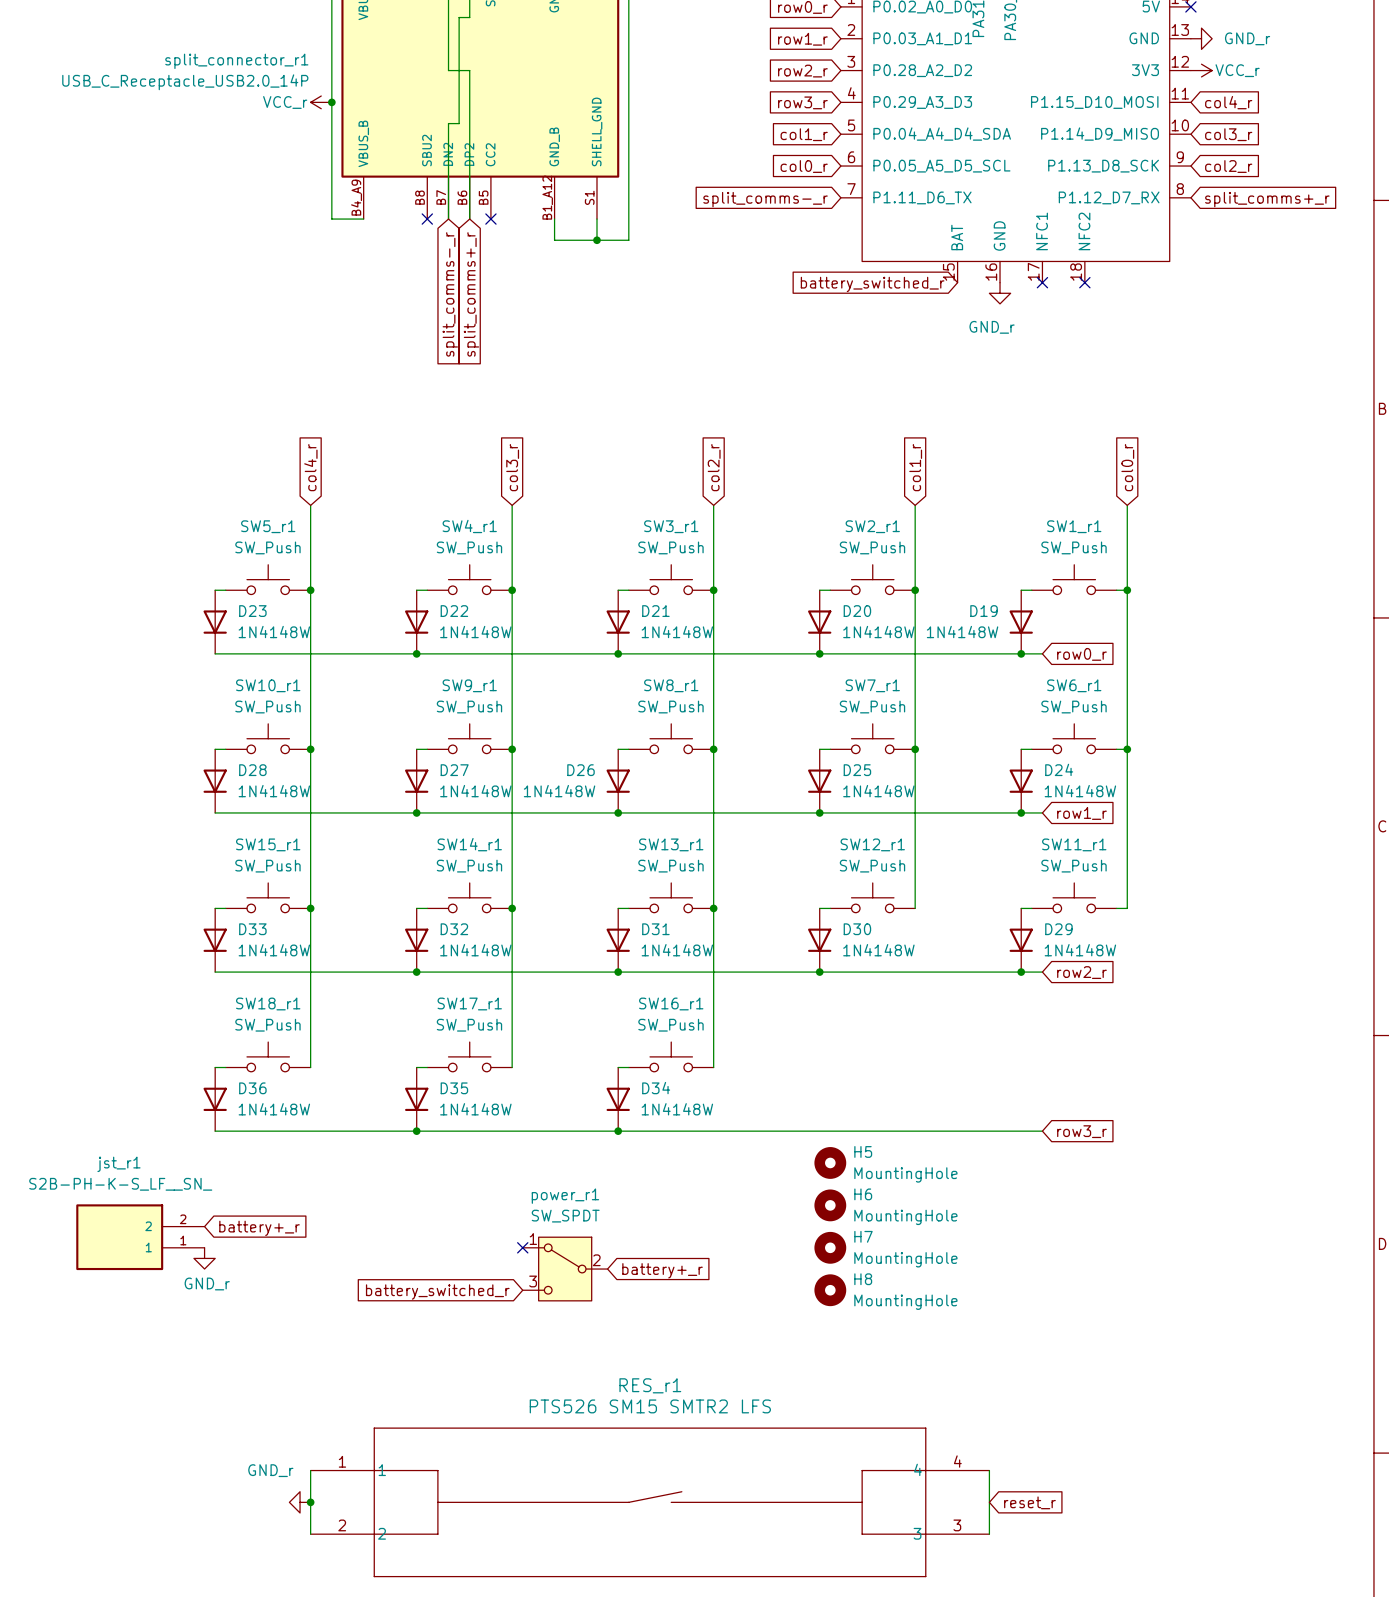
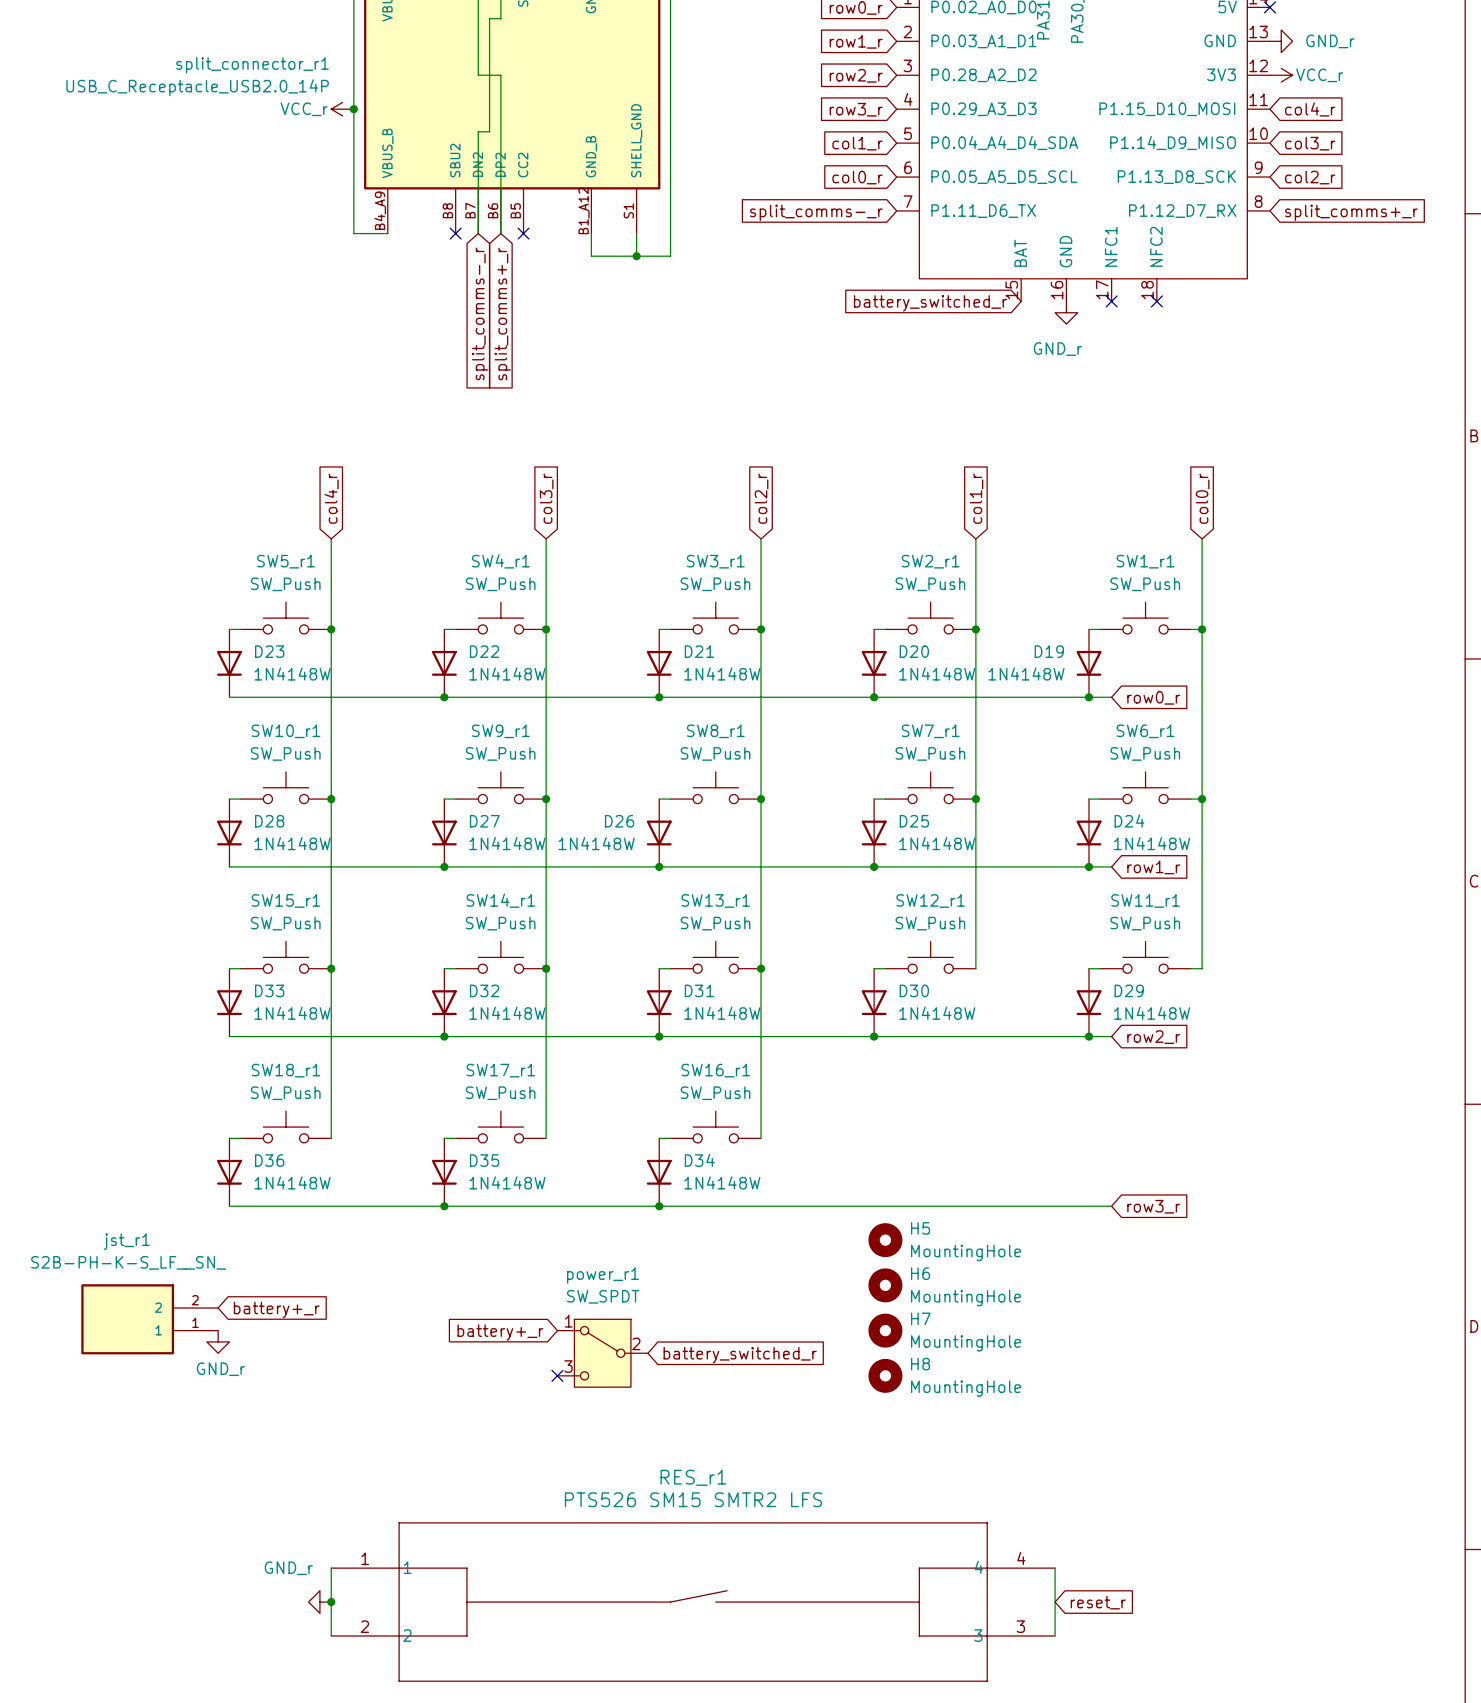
no-connect mark position: (522, 1247) -> (557, 1375)
global label: none -> battery+_r (500, 1332)
global label: battery+_r (662, 1270) -> battery_switched_r (740, 1355)
global label: battery_switched_r (437, 1292) -> none

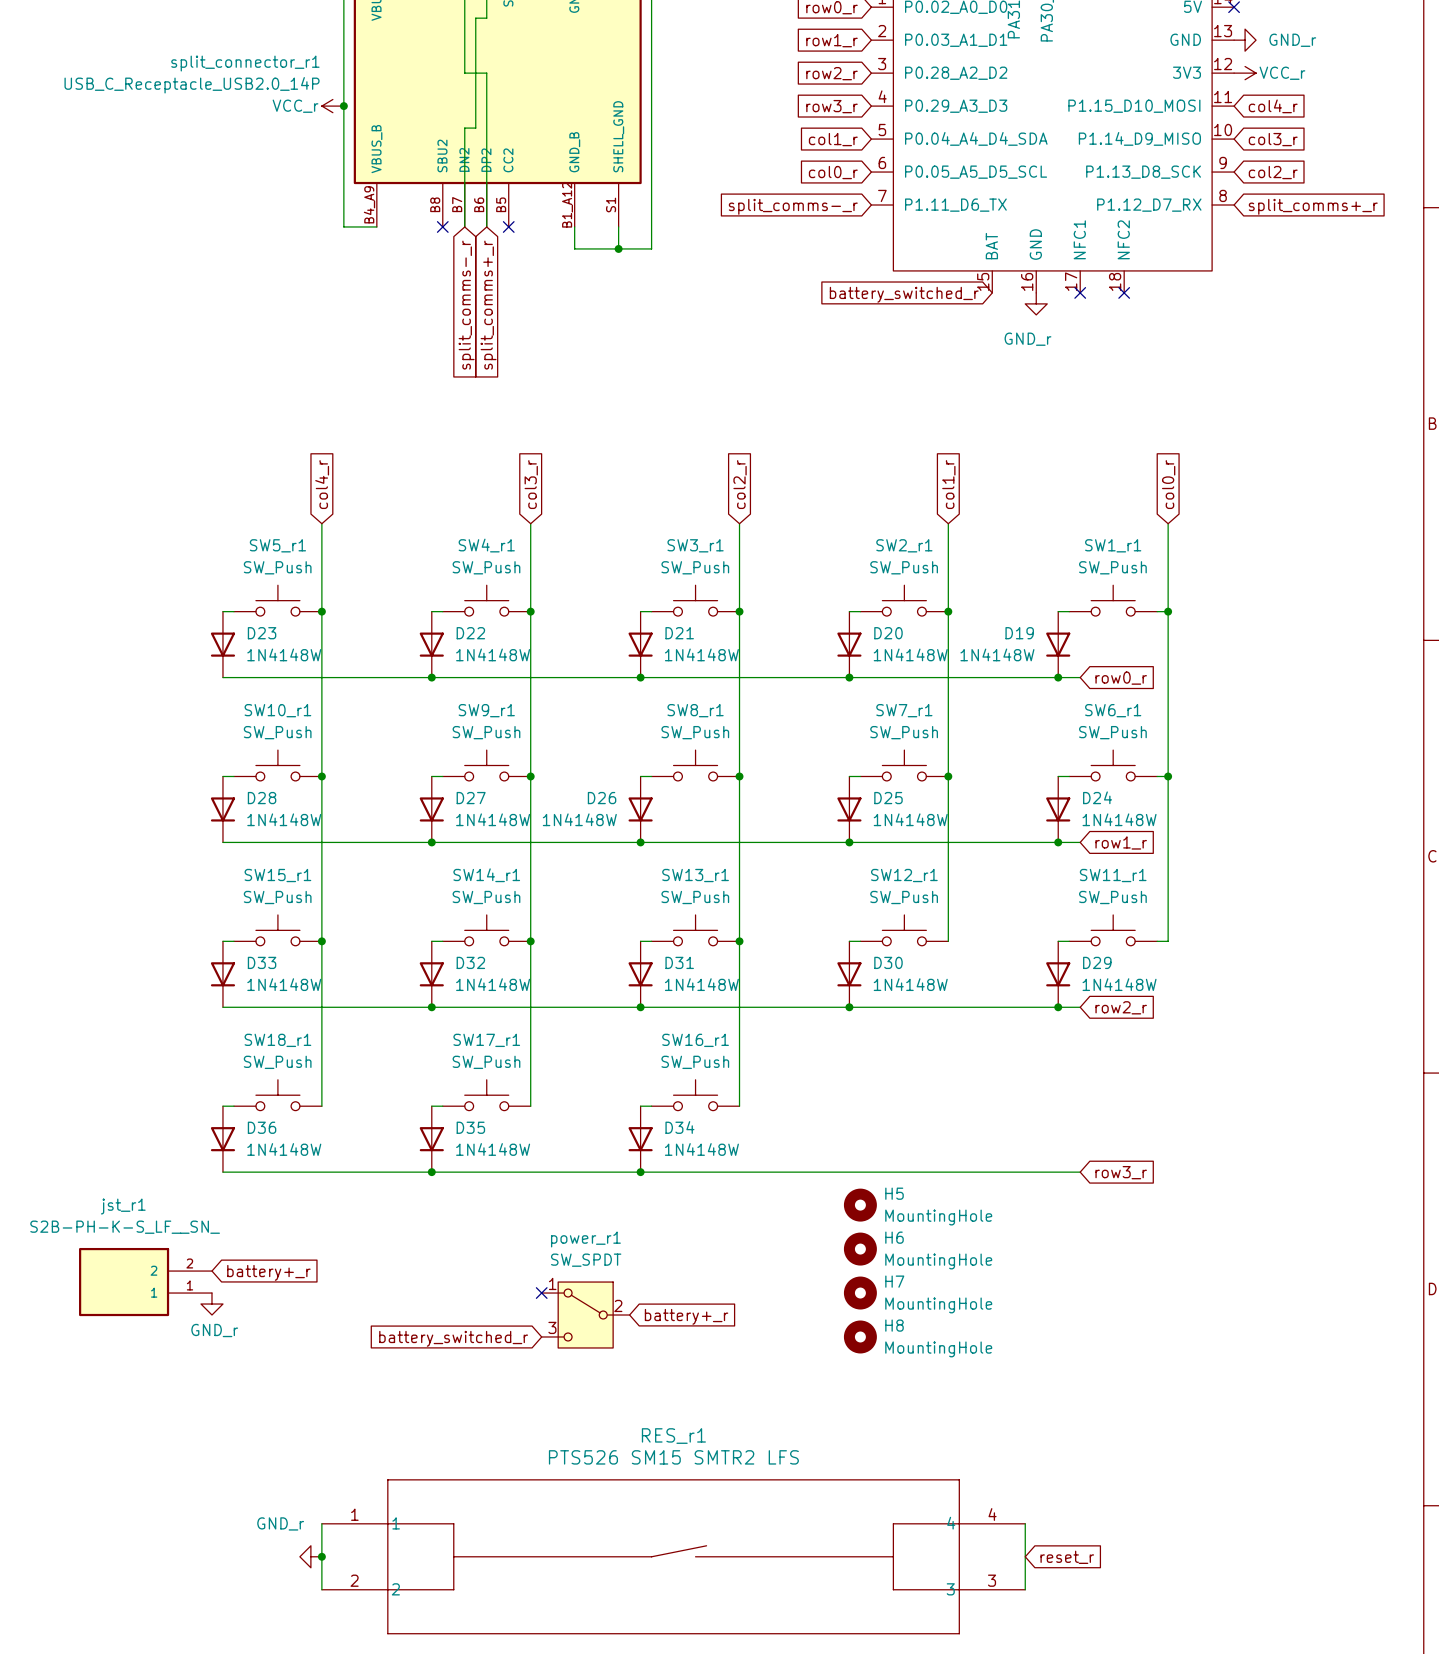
global label: battery+_r (500, 1332) -> none
global label: battery_switched_r (740, 1355) -> battery+_r (686, 1316)
no-connect mark position: (557, 1375) -> (541, 1293)
global label: none -> battery_switched_r (453, 1338)

